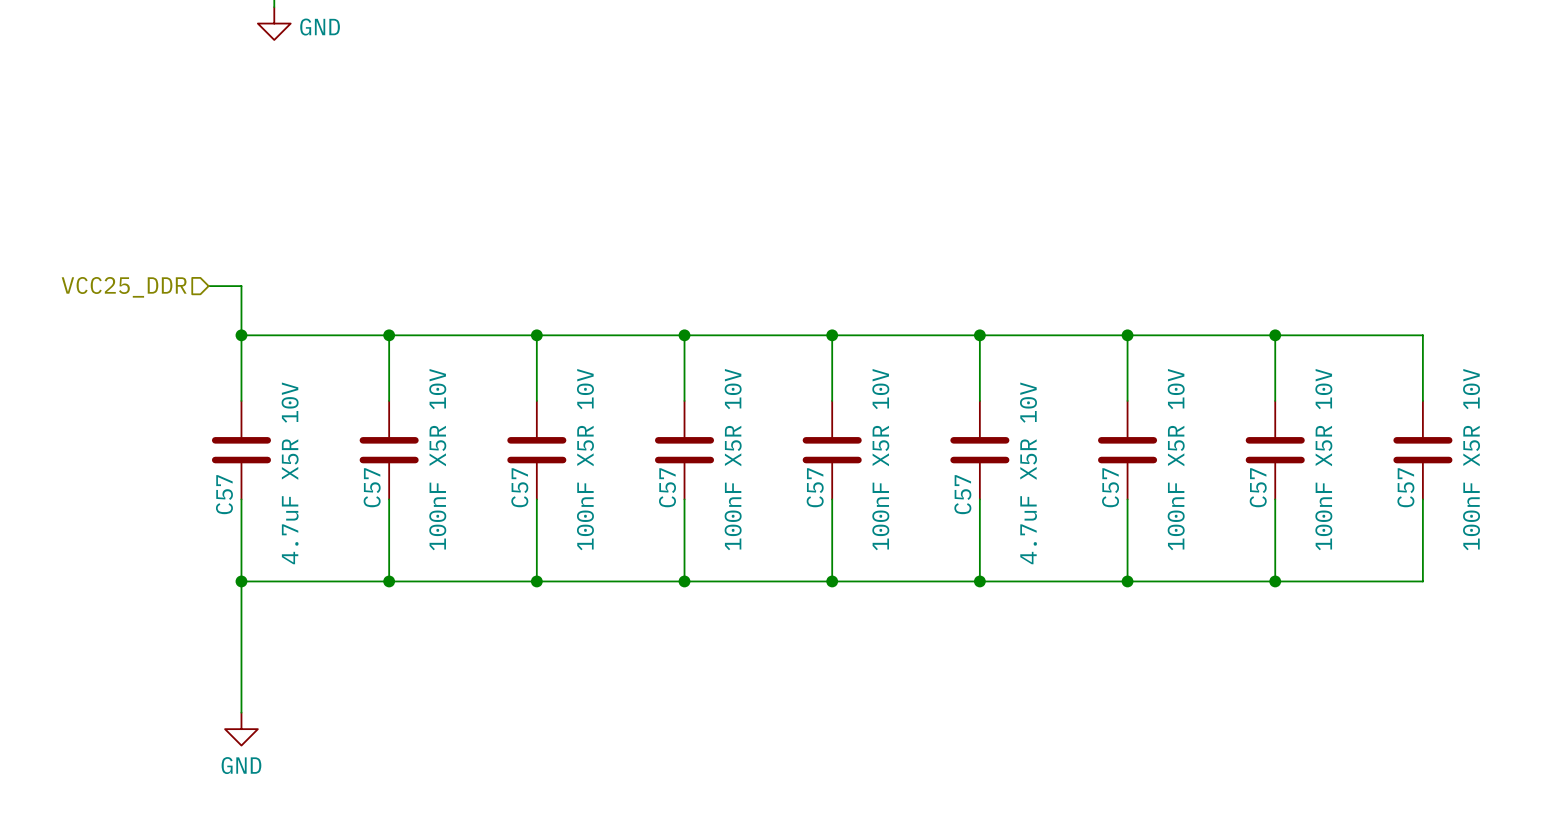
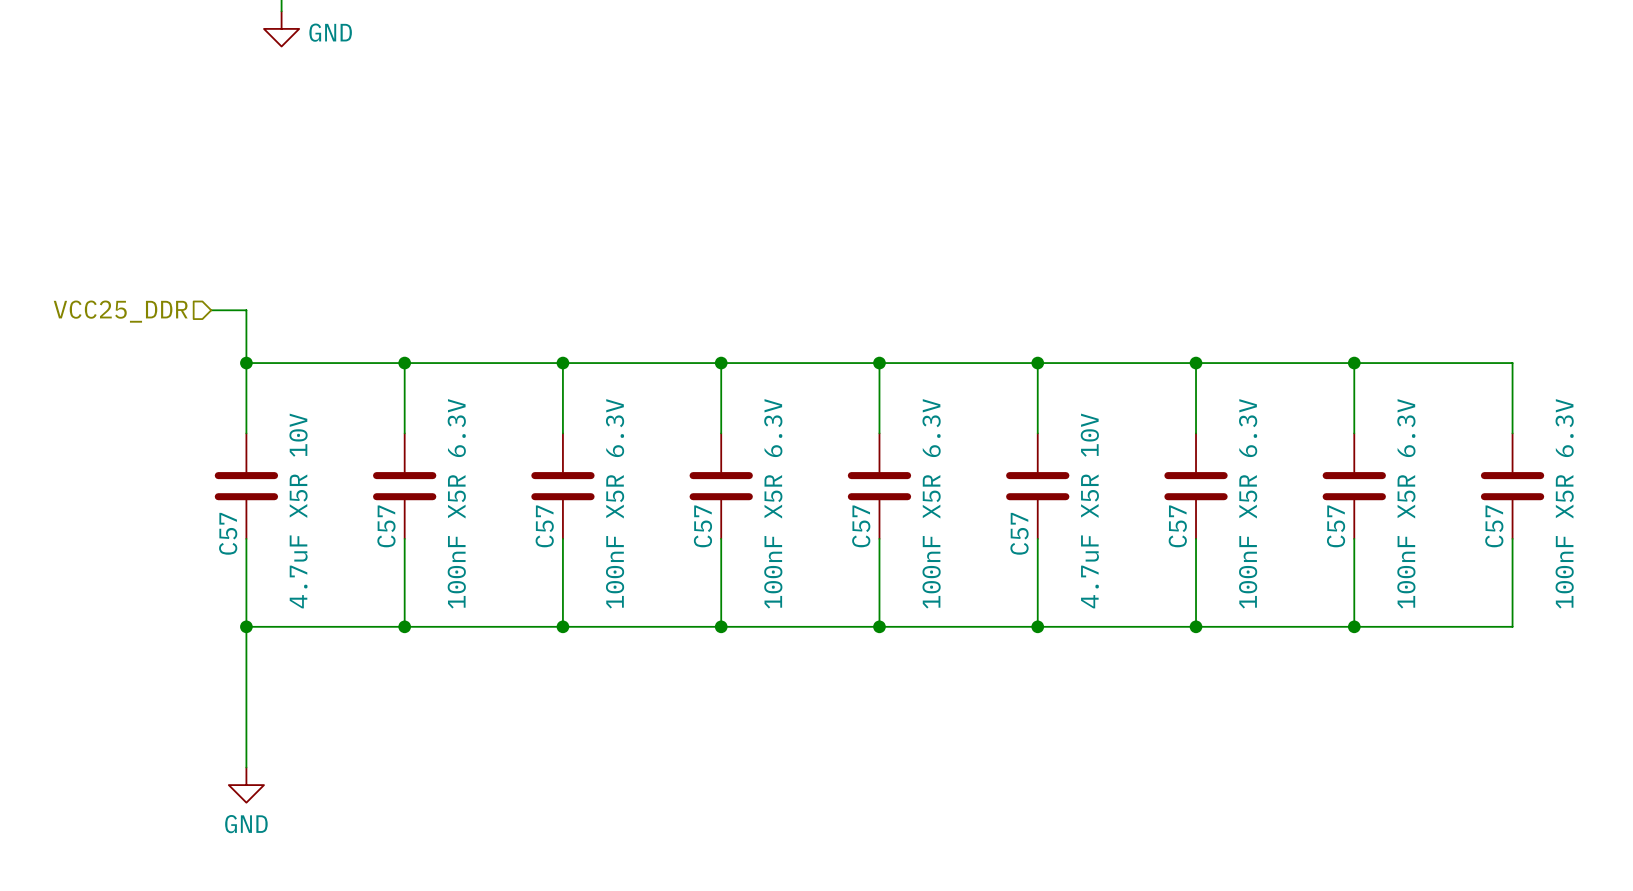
C57 value: 100nF X5R 10V (437, 459) -> 100nF X5R 6.3V (456, 503)
C57 value: 100nF X5R 10V (585, 459) -> 100nF X5R 6.3V (615, 503)
C57 value: 100nF X5R 10V (733, 459) -> 100nF X5R 6.3V (773, 503)
C57 value: 100nF X5R 10V (880, 459) -> 100nF X5R 6.3V (931, 503)
C57 value: 100nF X5R 10V (1176, 459) -> 100nF X5R 6.3V (1248, 503)
C57 value: 100nF X5R 10V (1323, 459) -> 100nF X5R 6.3V (1406, 503)
C57 value: 100nF X5R 10V (1471, 459) -> 100nF X5R 6.3V (1564, 503)

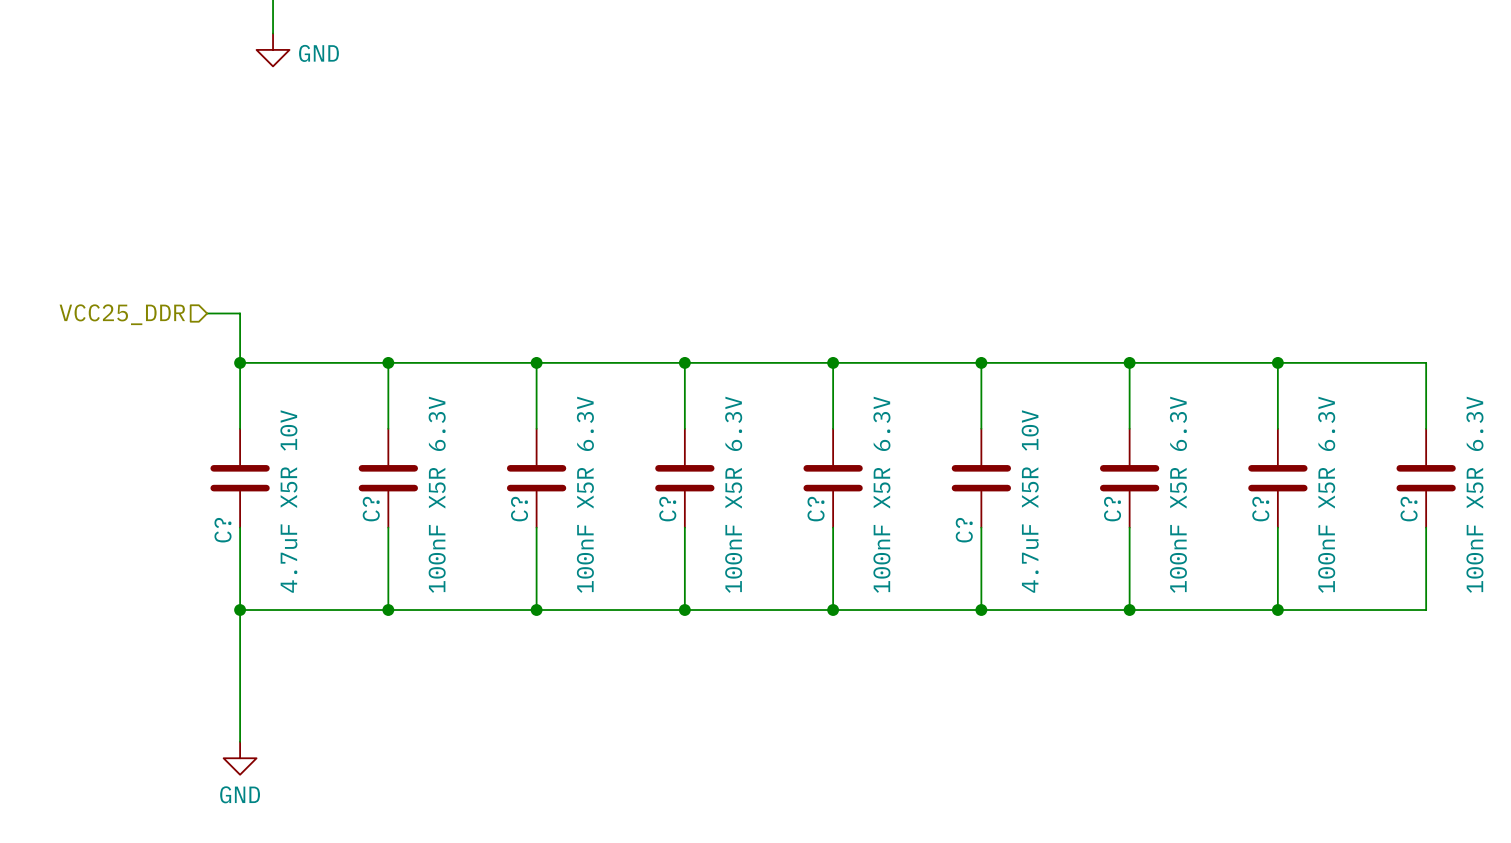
C57 name: C57 (386, 526) -> C? (371, 509)
C57 name: C57 (544, 526) -> C? (519, 509)
C57 name: C57 (702, 526) -> C? (667, 509)
C57 name: C57 (861, 526) -> C? (816, 509)
C57 name: C57 (1177, 526) -> C? (1112, 509)
C57 name: C57 (1336, 526) -> C? (1260, 509)
C57 name: C57 (1494, 526) -> C? (1409, 509)
C57 name: C57 (228, 533) -> C? (222, 530)
C57 name: C57 (1019, 533) -> C? (964, 530)

